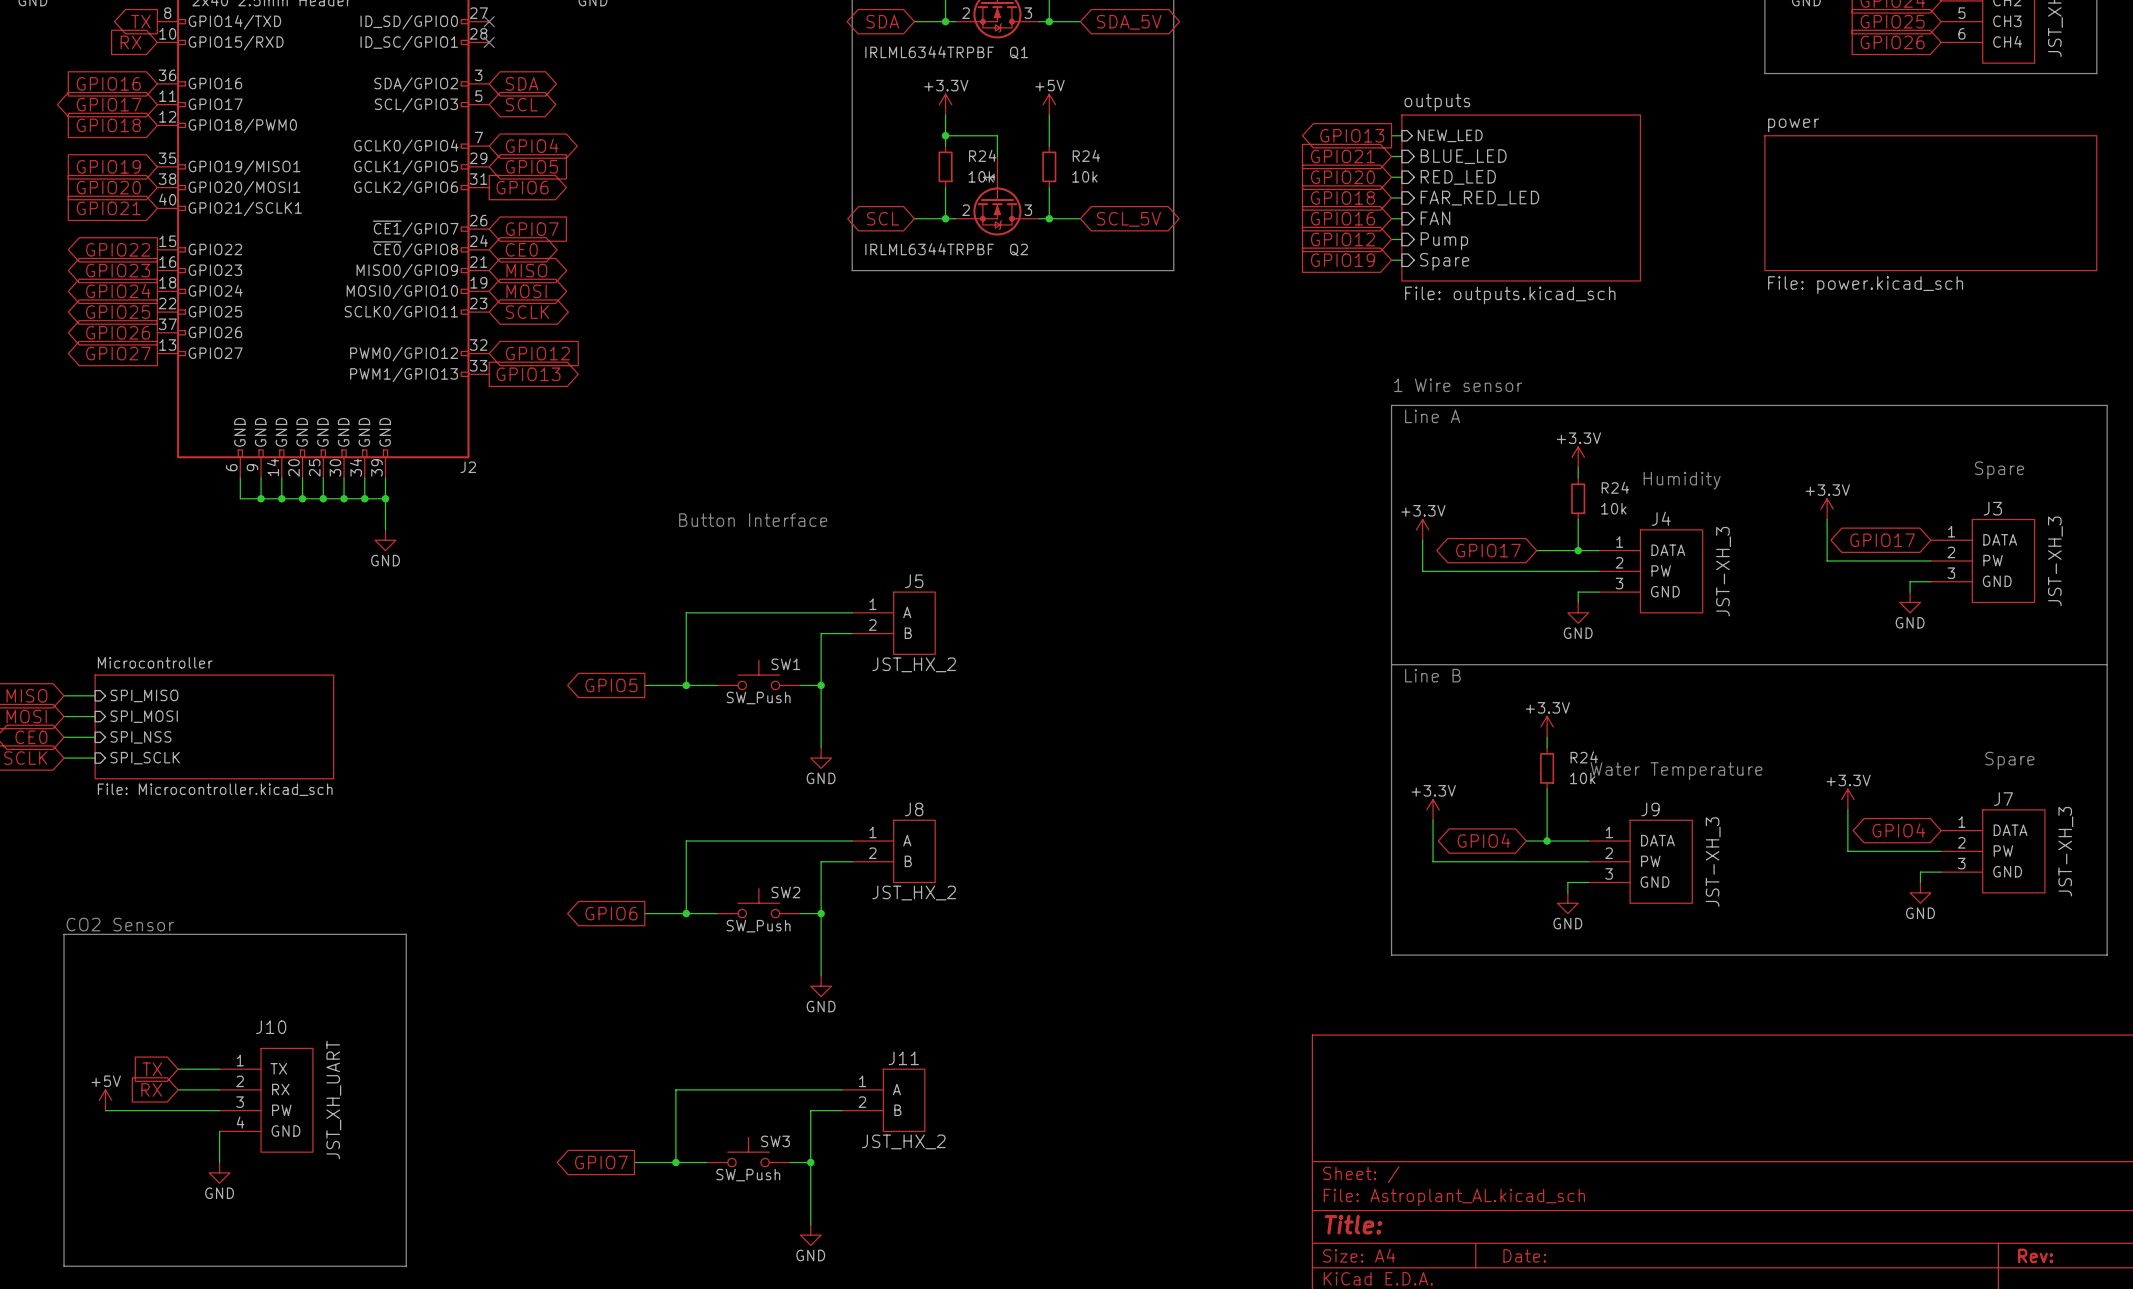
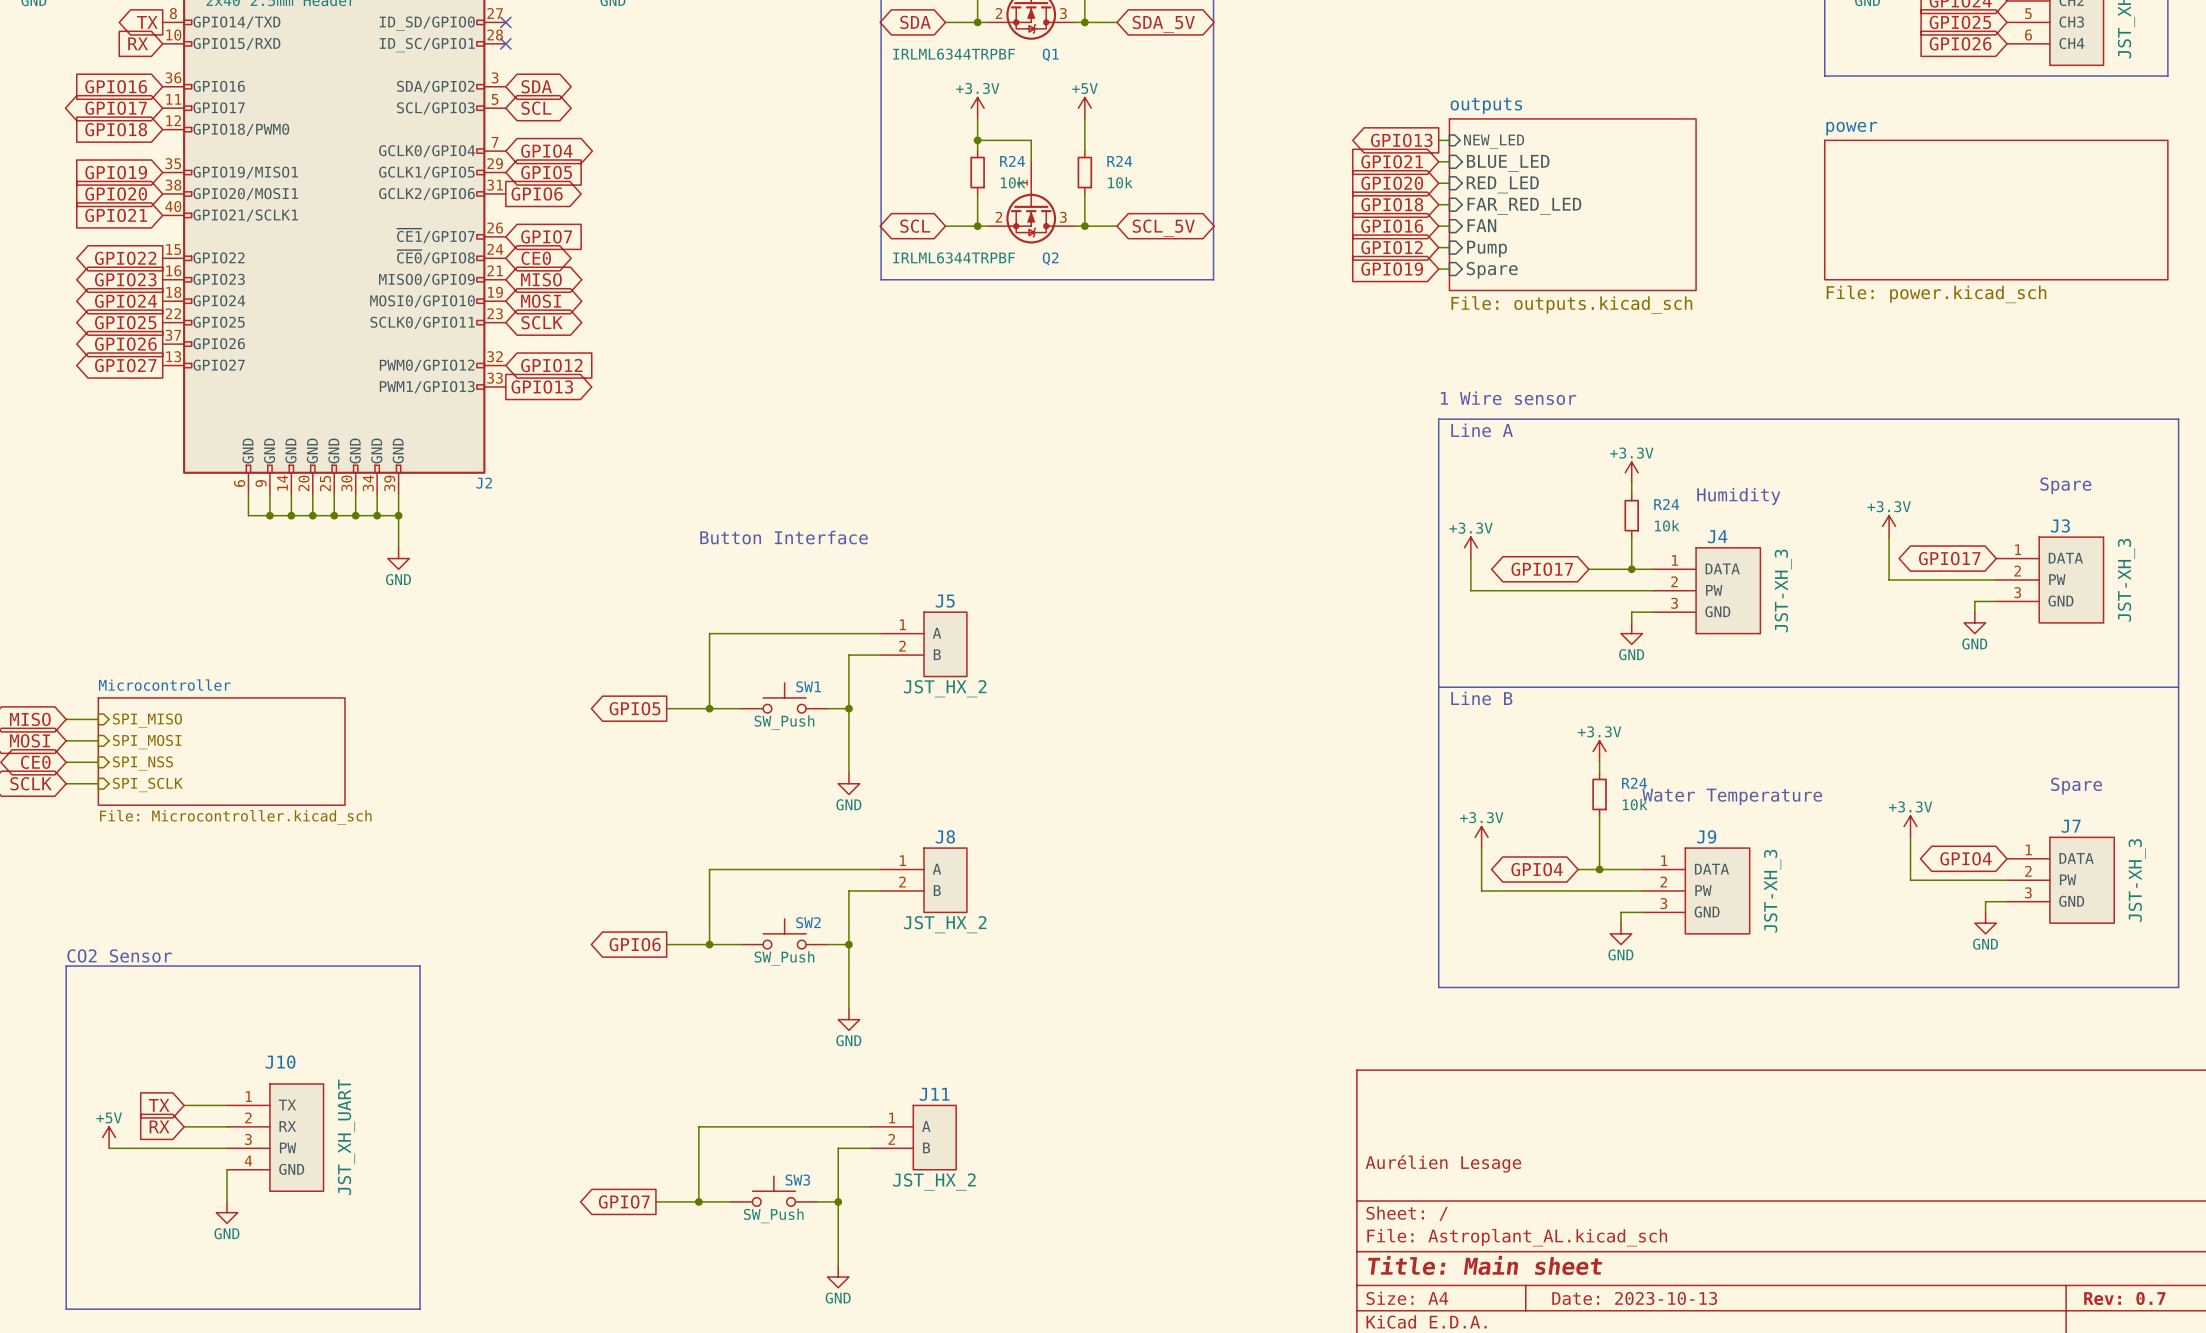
title block: none -> Aurélien Lesage (1443, 1163)
title block: Title: (1353, 1224) -> Title: Main sheet (1485, 1265)
title block: Date: (1524, 1255) -> Date: 2023-10-13 (1634, 1298)
title block: Rev: (2035, 1255) -> Rev: 0.7 (2124, 1298)

